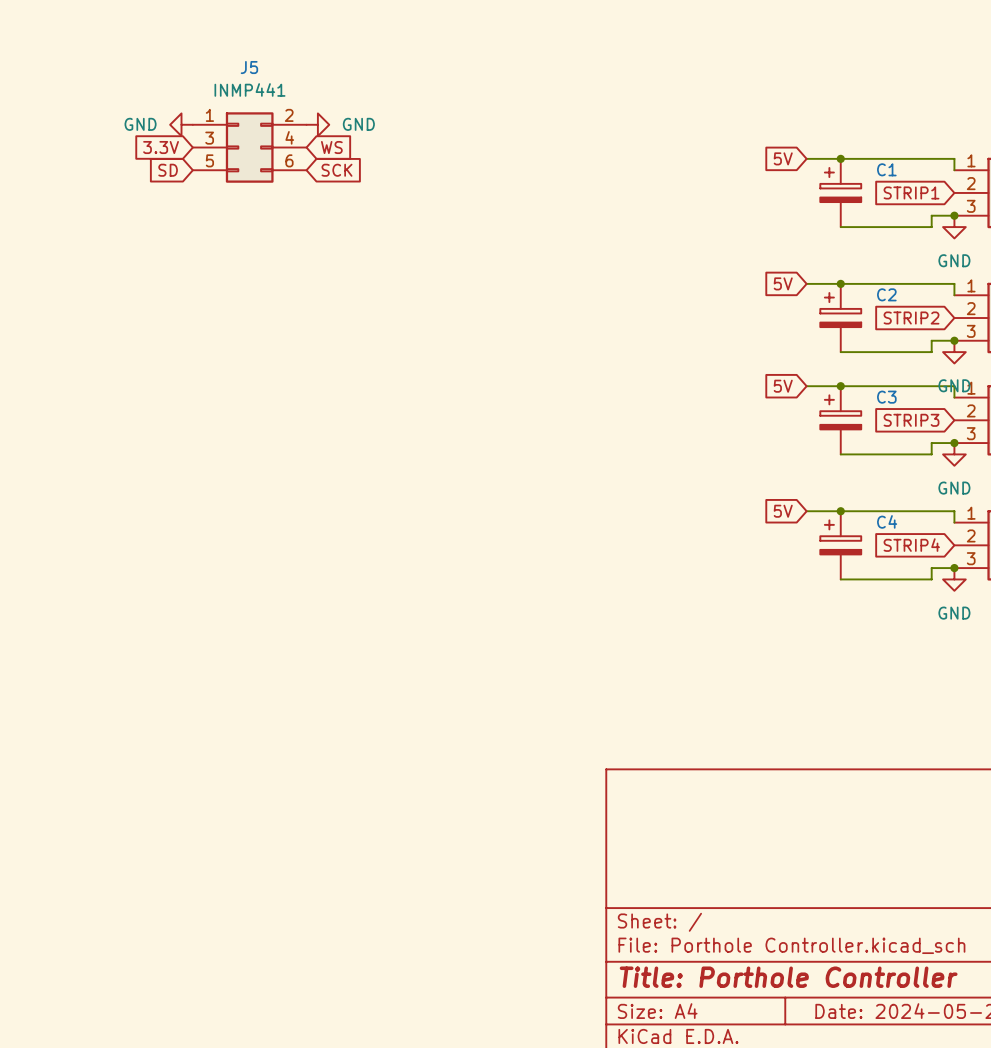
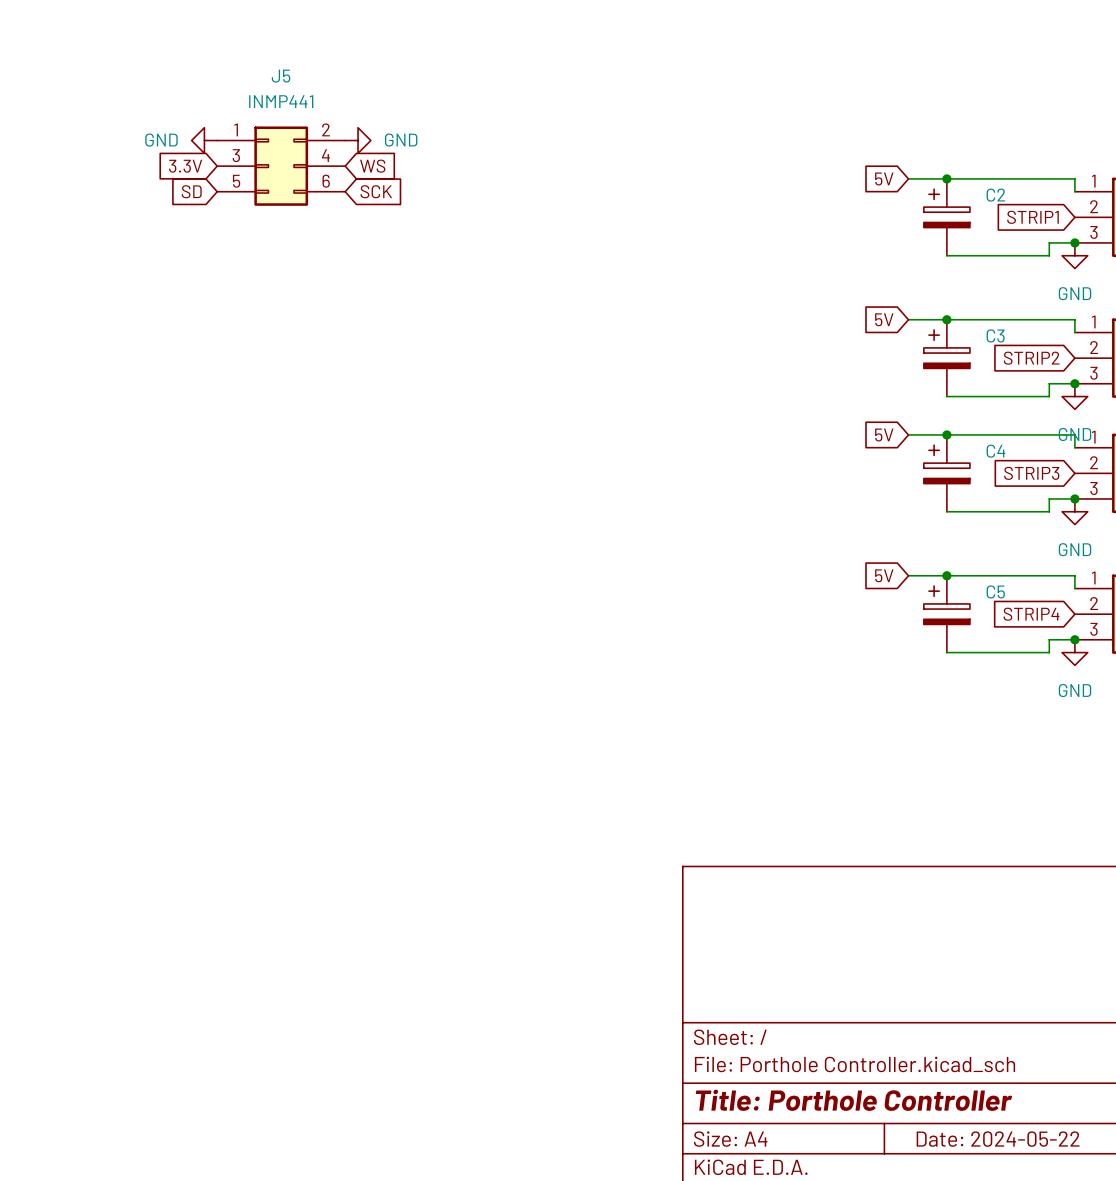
C1 name: C1 (886, 169) -> C2 (995, 195)
C2 name: C2 (886, 294) -> C3 (995, 335)
C3 name: C3 (886, 397) -> C4 (995, 451)
C4 name: C4 (887, 521) -> C5 (995, 591)

